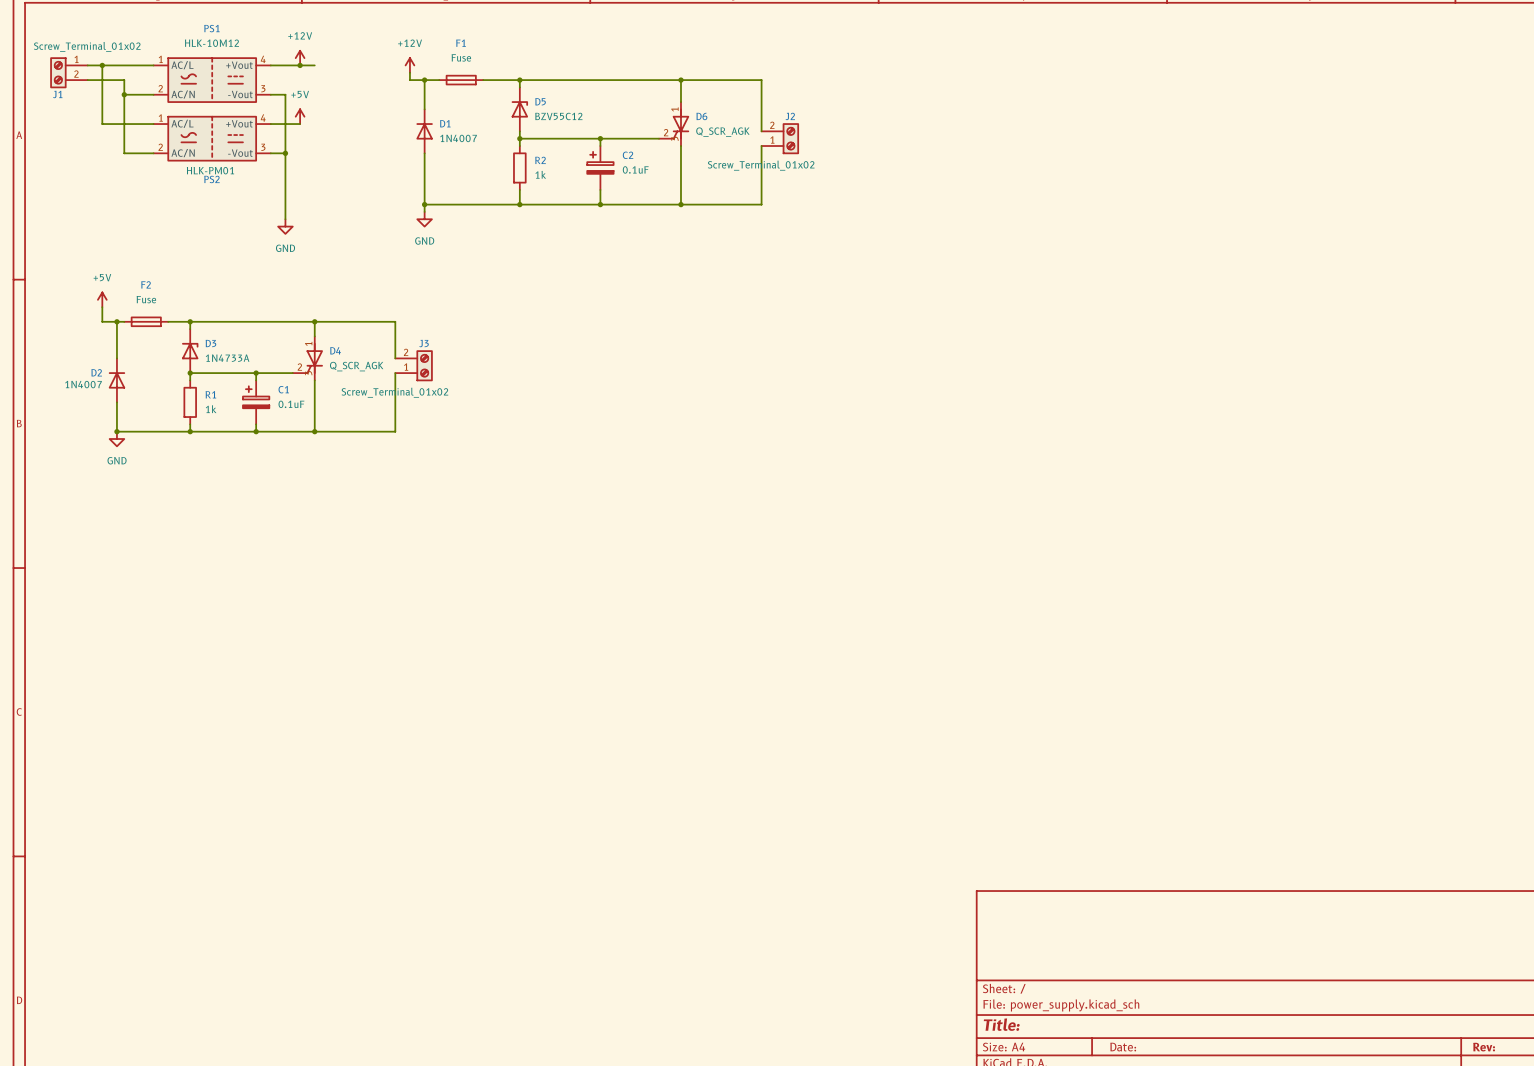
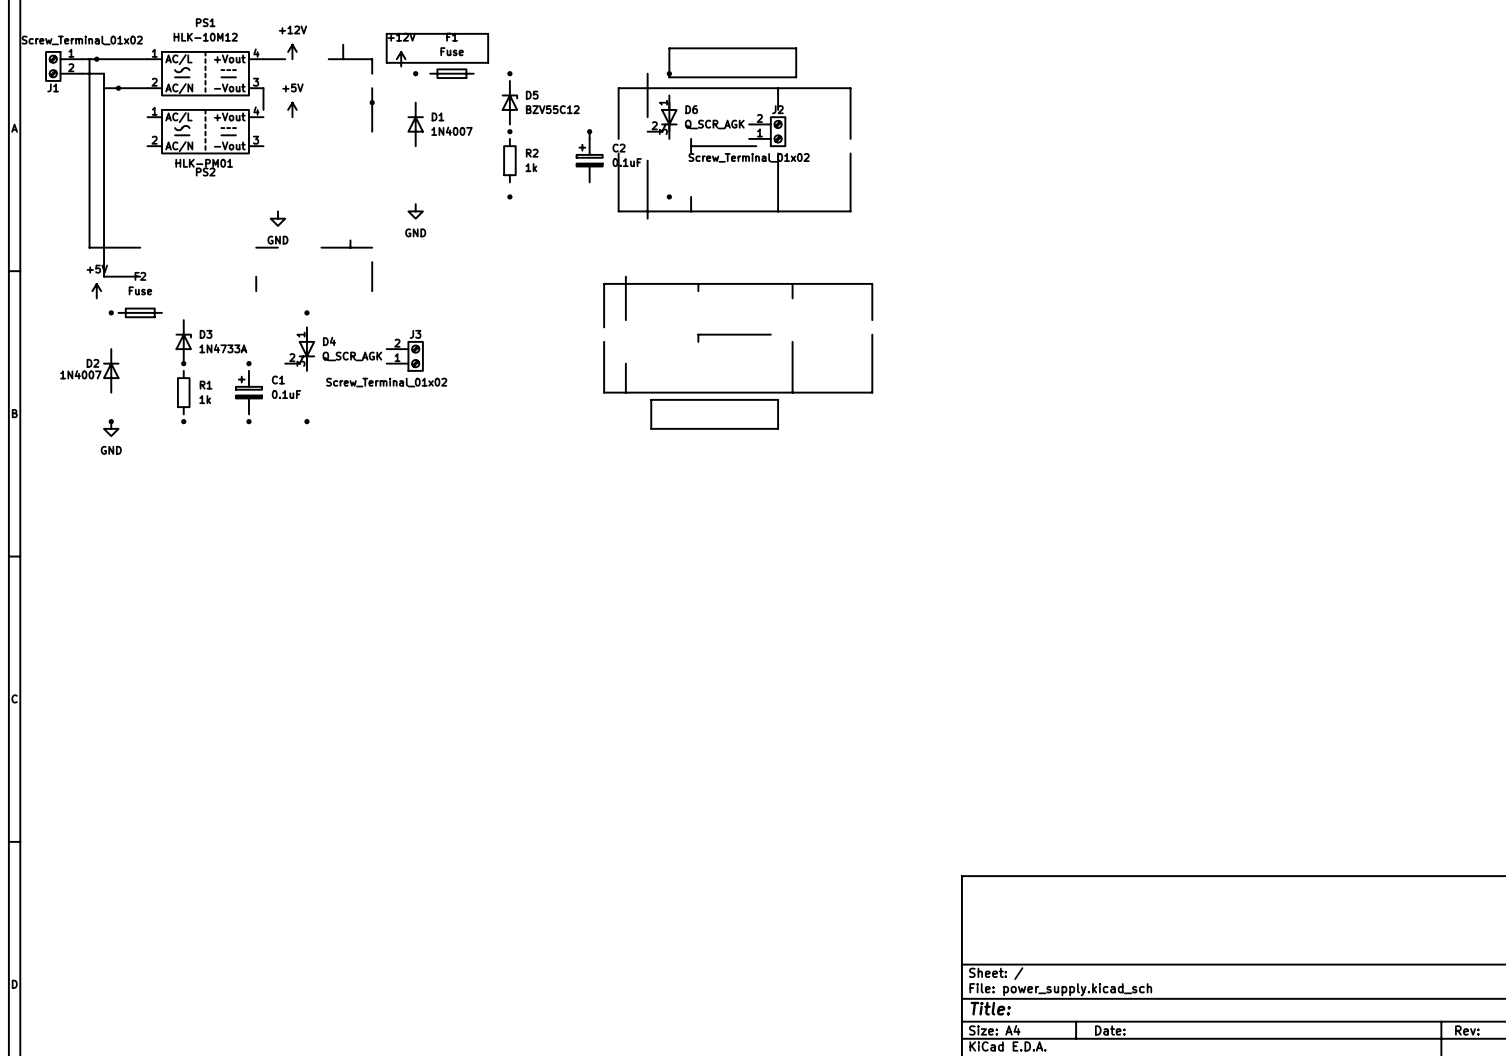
line: none -> (386, 33) (488, 33) (488, 62) (386, 62) (386, 33)
wire: none -> (343, 44) (343, 59)
line: none -> (669, 48) (796, 48) (796, 77) (669, 77) (669, 48)
wire: none -> (89, 59) (89, 247) (140, 247)
wire: (102, 65) (102, 124) (153, 124) -> none
wire: (292, 65) (314, 65) -> none
junction: (300, 65) -> none
wire: none -> (328, 59) (372, 59) (372, 73)
wire: (409, 72) (409, 80) (439, 80) -> none
wire: (109, 80) (124, 80) (124, 153) (153, 153) -> (104, 73) (104, 276) (140, 276)
wire: (424, 80) (424, 109) -> none
wire: (483, 80) (761, 80) (761, 131) -> none
wire: (519, 80) (519, 87) -> none
wire: none -> (647, 73) (647, 117)
wire: (680, 80) (680, 102) -> (778, 88) (778, 109)
wire: none -> (104, 88) (118, 88)
wire: (270, 94) (285, 94) (285, 219) -> (263, 88) (263, 109)
wire: none -> (372, 88) (372, 131)
junction: none -> (372, 102)
wire: (270, 124) (300, 124) -> none
wire: (519, 131) (519, 146) -> none
wire: (519, 138) (659, 138) -> none
wire: none -> (618, 138) (618, 88) (850, 88) (850, 138)
wire: (680, 146) (680, 204) -> (778, 153) (778, 211)
wire: none -> (691, 138) (691, 153)
wire: (761, 146) (761, 204) (424, 204) -> none
wire: (270, 153) (285, 153) -> none
junction: (285, 153) -> none
wire: (424, 153) (424, 211) -> none
wire: none -> (691, 146) (756, 146)
wire: none -> (618, 153) (618, 211) (850, 211) (850, 153)
wire: none -> (647, 160) (647, 218)
wire: (519, 189) (519, 204) -> none
wire: (600, 189) (600, 204) -> (691, 196) (691, 211)
junction: (424, 204) -> none
junction: (600, 204) -> none
wire: none -> (350, 240) (350, 247)
wire: none -> (256, 247) (277, 247)
wire: none -> (321, 247) (372, 247)
wire: none -> (372, 262) (372, 291)
wire: none -> (625, 276) (625, 320)
wire: none -> (698, 283) (698, 291)
wire: none -> (792, 283) (792, 298)
wire: (102, 307) (102, 321) (124, 321) -> none
wire: (116, 321) (116, 358) -> none
wire: (168, 321) (395, 321) (395, 358) -> none
wire: (190, 321) (190, 329) -> none
junction: (190, 321) -> none
wire: (314, 321) (314, 336) -> (256, 276) (256, 291)
wire: none -> (872, 320) (872, 283) (604, 283) (604, 327)
wire: none -> (770, 334) (698, 334) (698, 341)
wire: none -> (872, 334) (872, 392) (604, 392) (604, 341)
wire: none -> (792, 341) (792, 392)
wire: (256, 373) (256, 380) -> none
wire: (292, 373) (190, 373) (190, 380) -> none
wire: (395, 373) (395, 431) (116, 431) (116, 402) -> none
wire: none -> (625, 363) (625, 392)
wire: (314, 380) (314, 431) -> none
line: none -> (651, 399) (778, 399) (778, 428) (651, 428) (651, 399)
wire: (190, 424) (190, 431) -> none
wire: (256, 424) (256, 431) -> none

